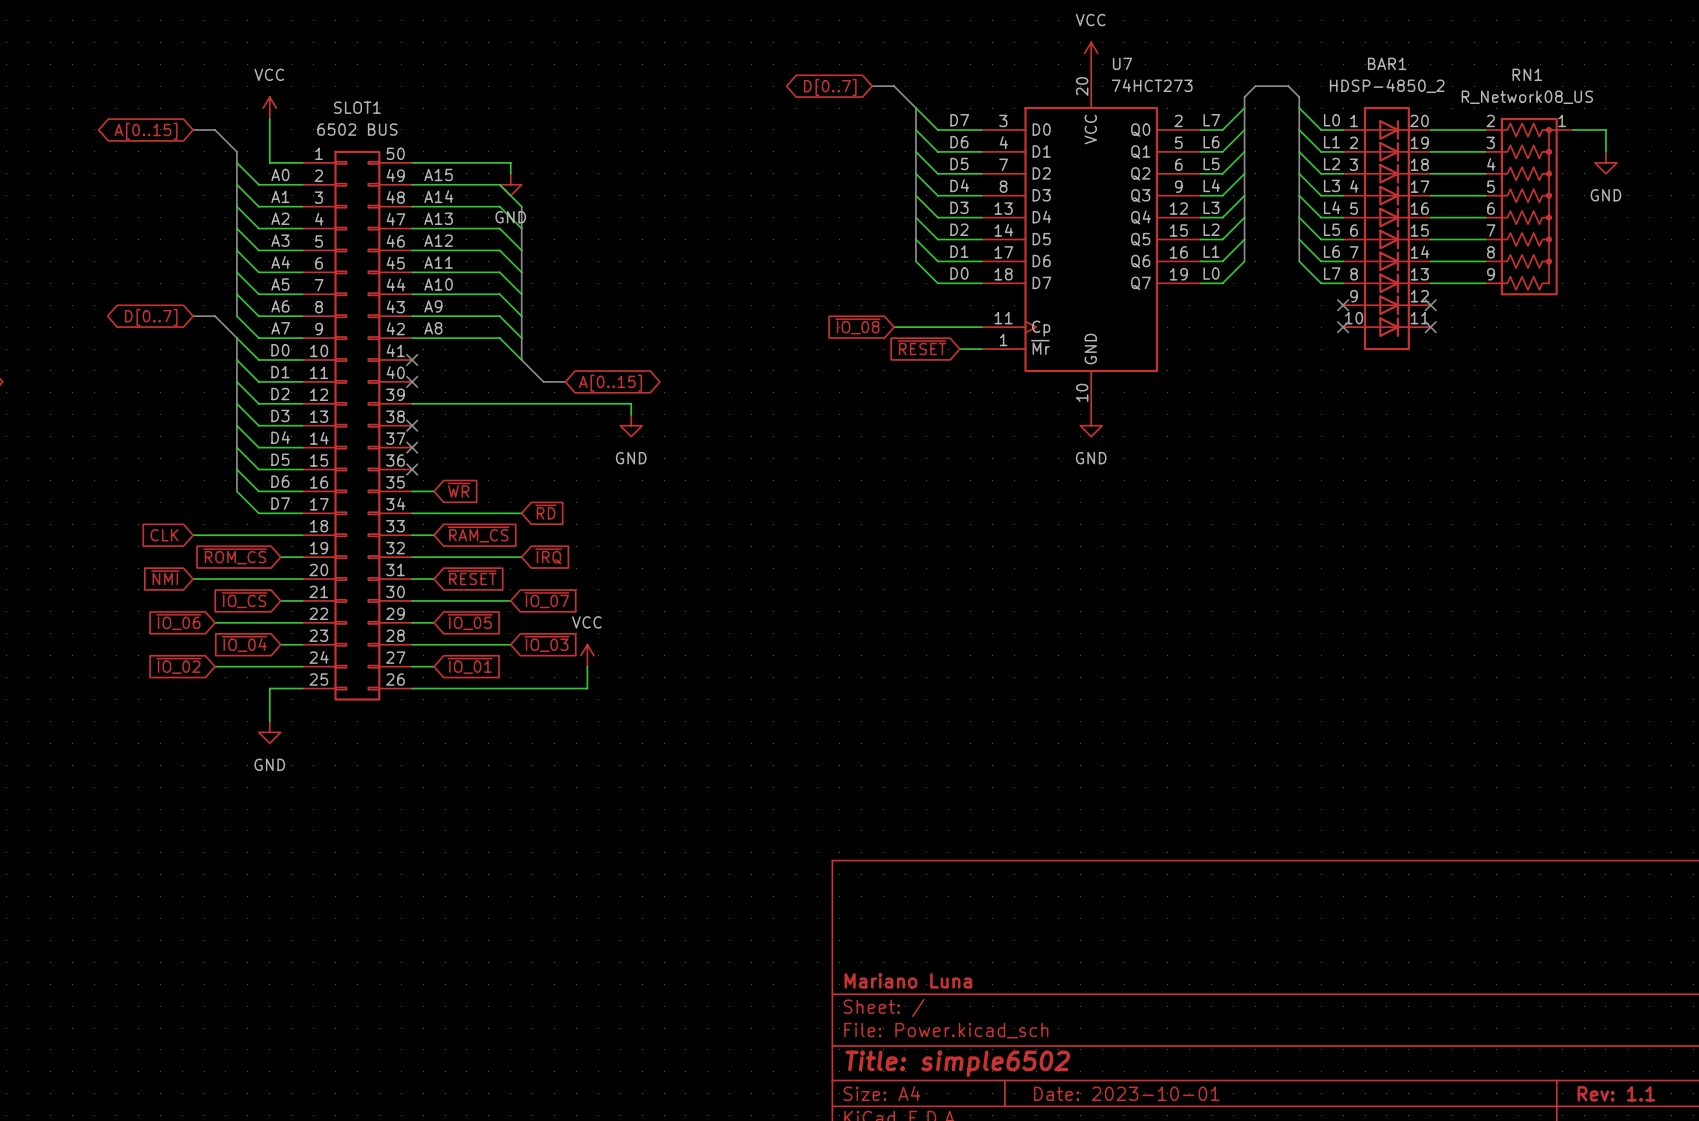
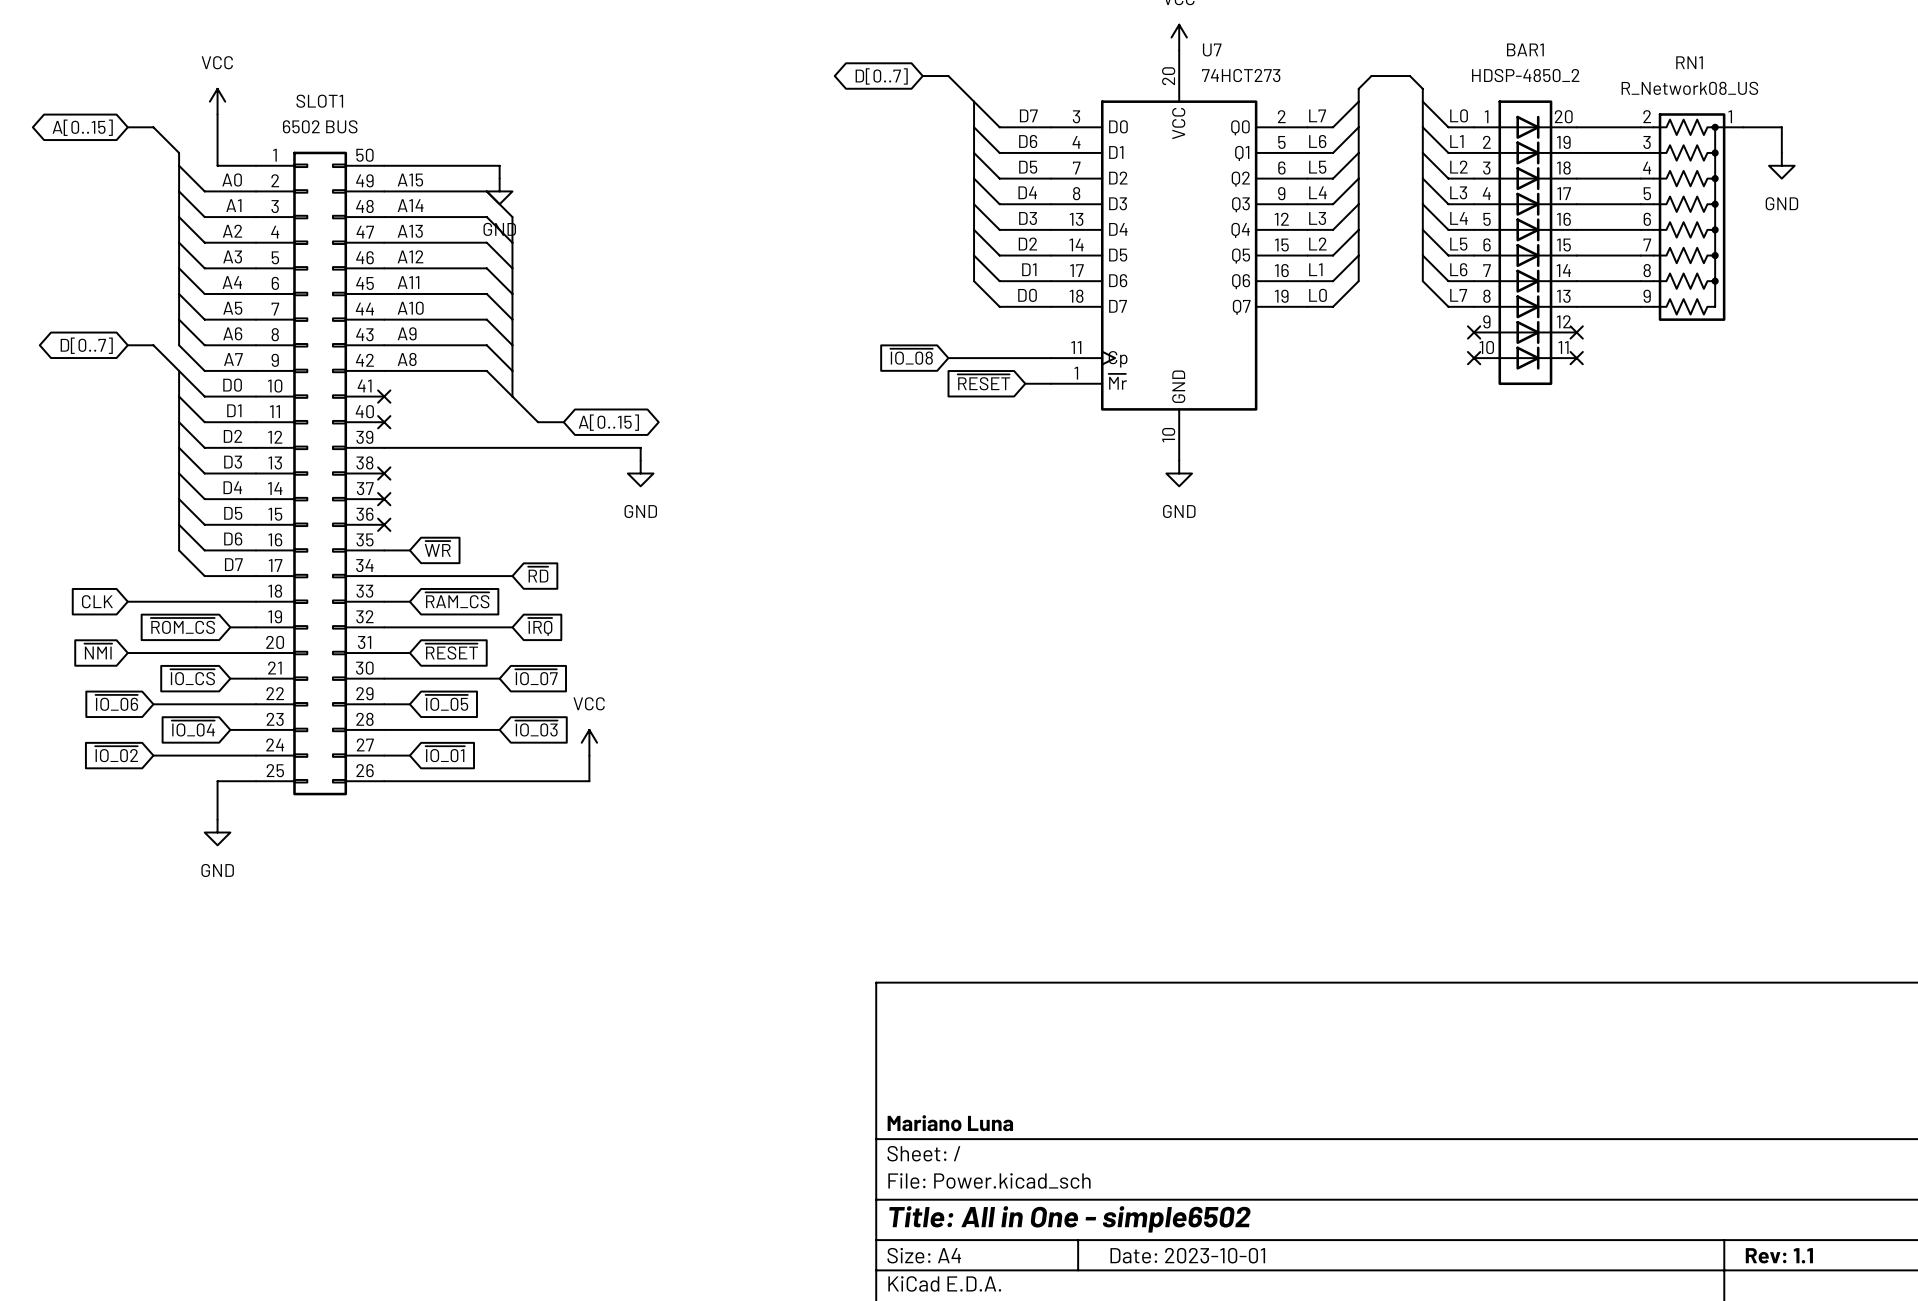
title block: Title: simple6502 (957, 1063) -> Title: All in One - simple6502 (1069, 1219)

